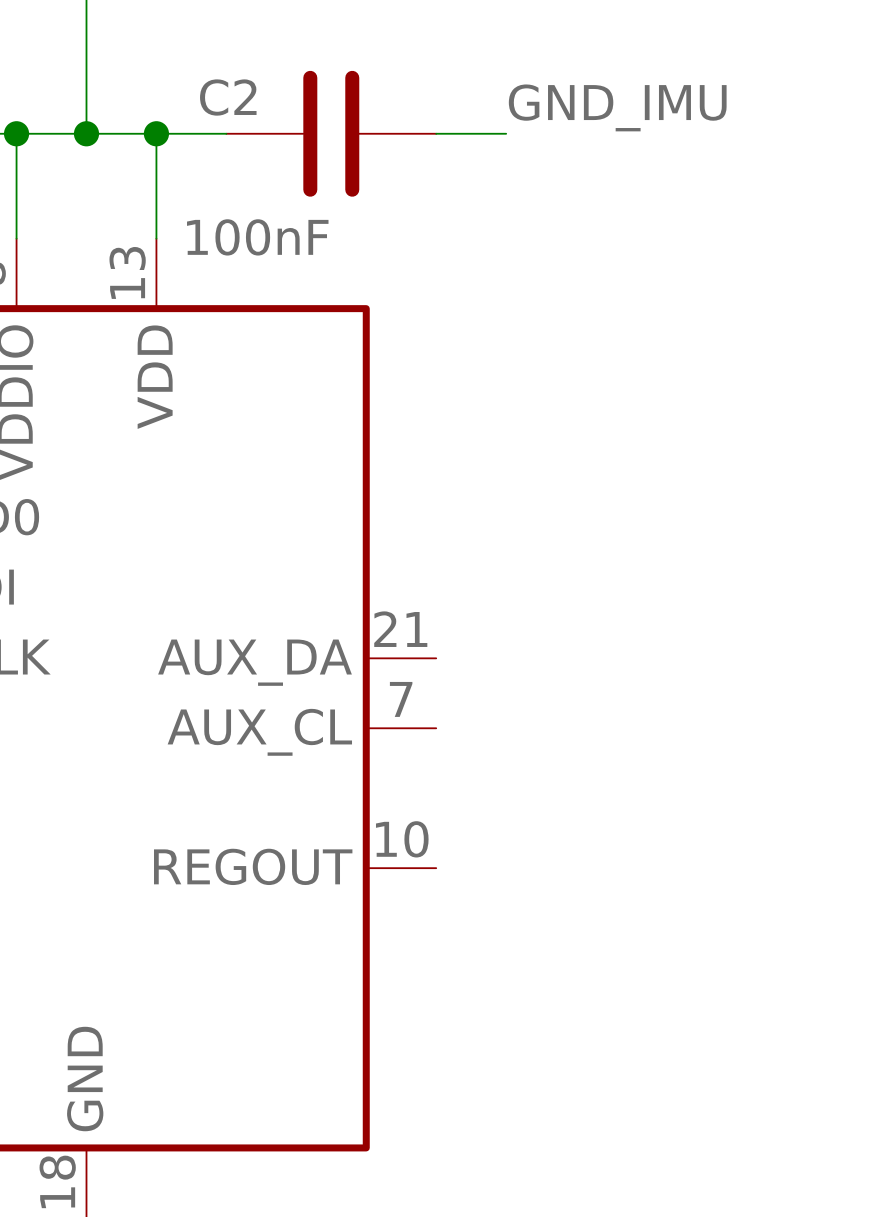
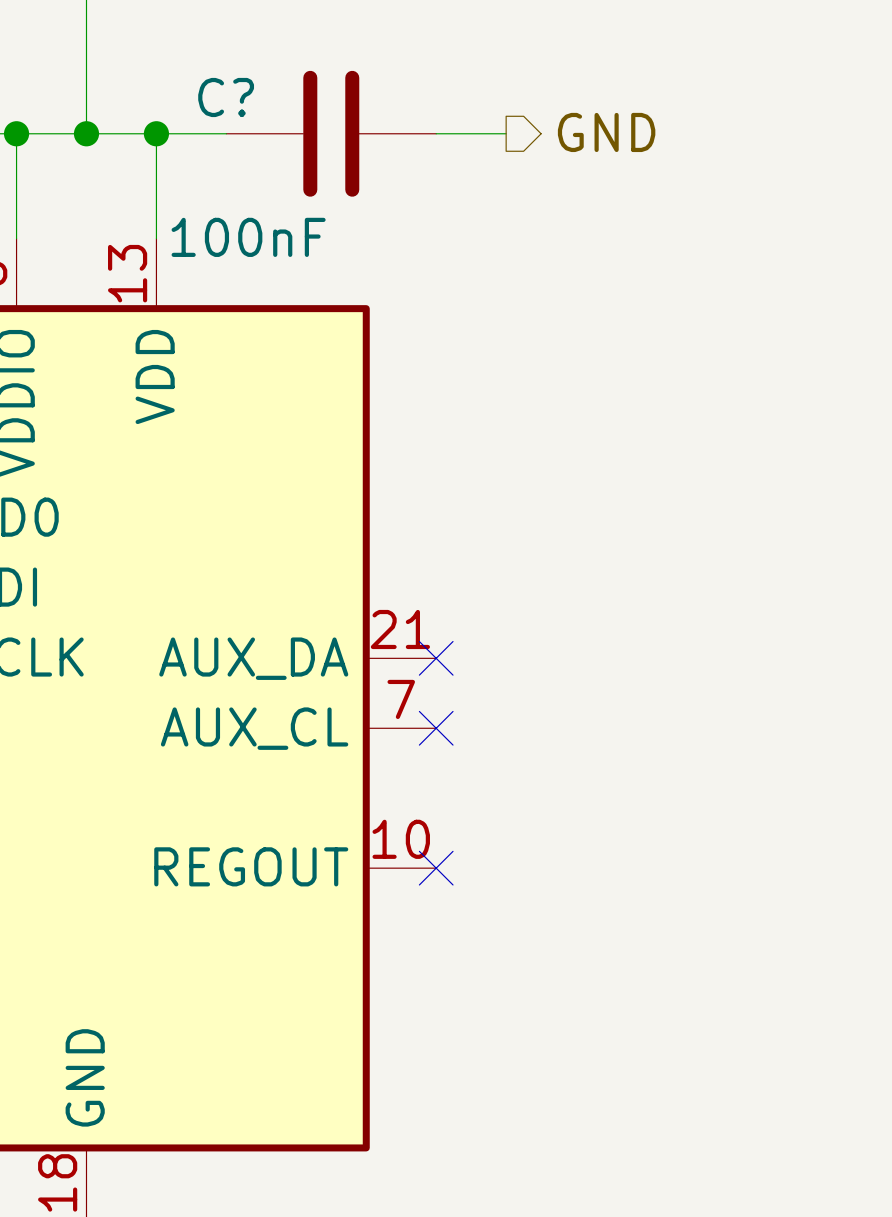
C2 name: C2 (228, 97) -> C? (226, 97)
label: GND_IMU (617, 107) -> none
hierarchical label: none -> GND (606, 132)
no-connect mark: none -> (436, 658)
no-connect mark: none -> (436, 728)
no-connect mark: none -> (436, 868)

